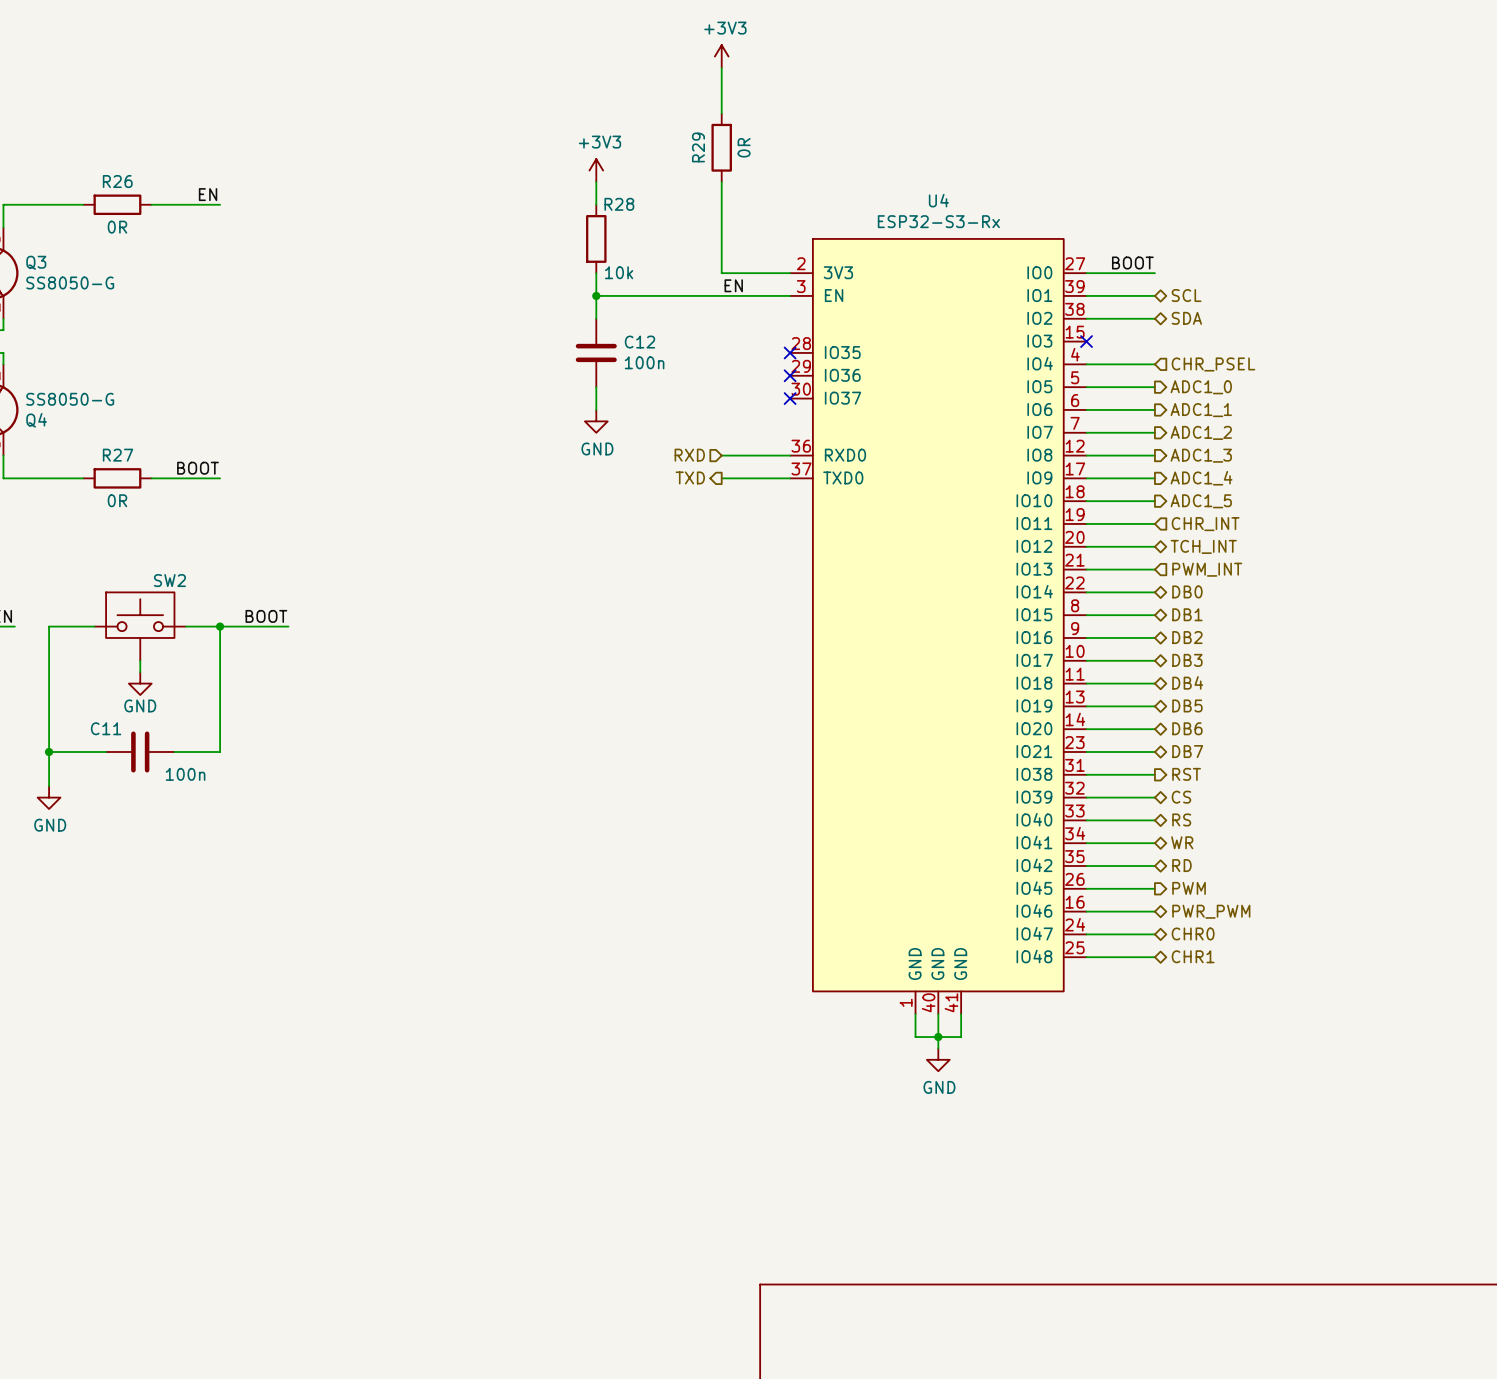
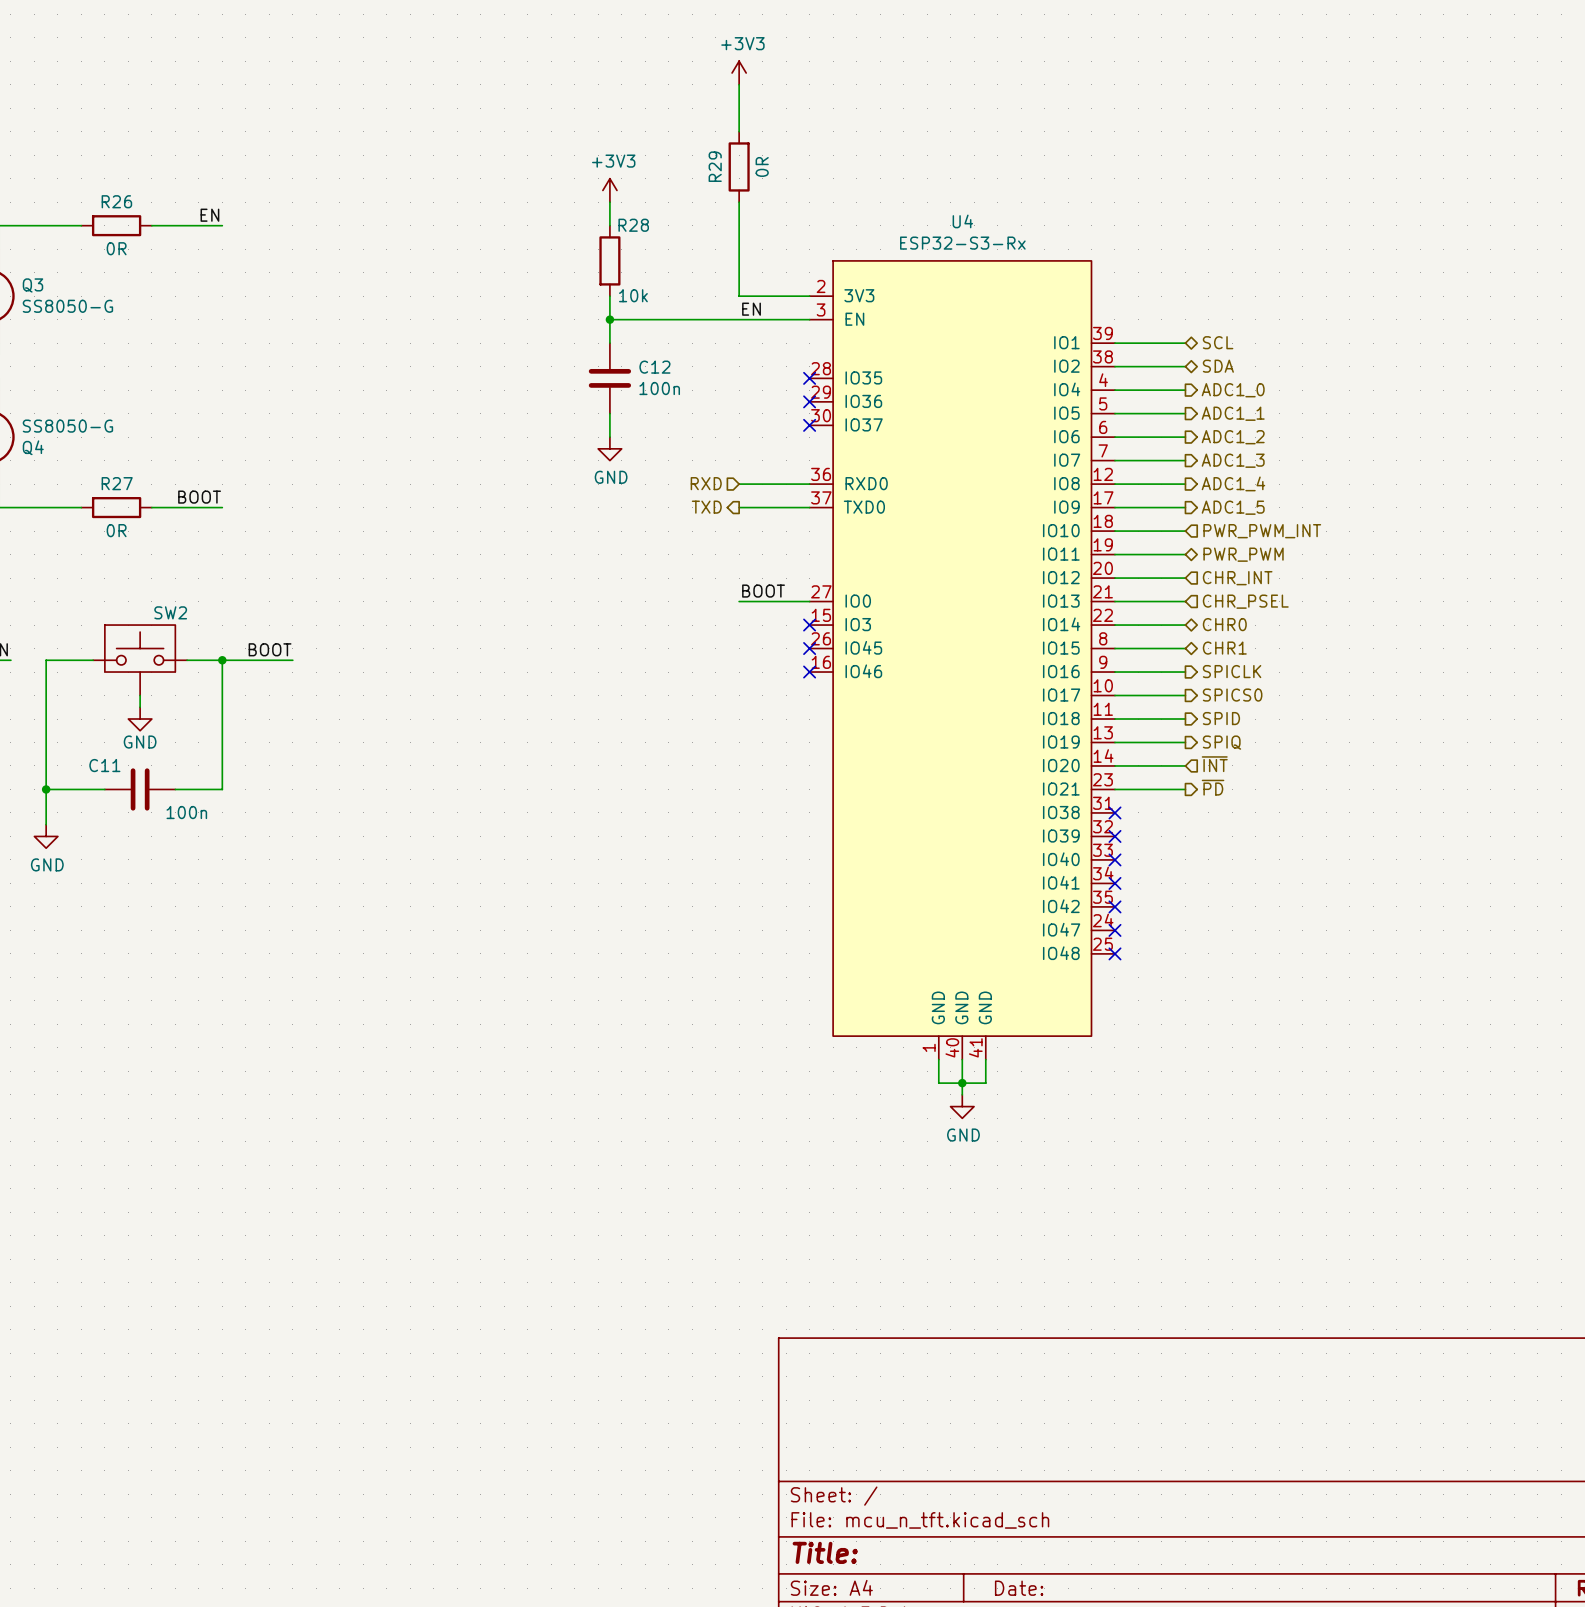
U4 symbol: [790, 238, 1087, 1015] -> [809, 260, 1115, 1060]
label: BOOT (1132, 262) -> none
wire: (1086, 273) (1154, 273) -> none
wire: (1086, 295) (1154, 295) -> (1114, 366) (1185, 366)
hierarchical label: SCL (1186, 295) -> none
hierarchical label: SDA (1186, 318) -> SCL (1218, 342)
no-connect mark: (1086, 341) -> none
hierarchical label: none -> SDA (1218, 366)
hierarchical label shape: input (1213, 364) -> output (1233, 390)
hierarchical label: CHR_PSEL (1213, 364) -> ADC1_0 (1233, 390)
hierarchical label: ADC1_0 (1201, 387) -> ADC1_1 (1233, 413)
hierarchical label: ADC1_1 (1201, 410) -> ADC1_2 (1233, 437)
hierarchical label: ADC1_2 (1201, 432) -> ADC1_3 (1233, 460)
hierarchical label: ADC1_3 (1201, 455) -> ADC1_4 (1233, 483)
hierarchical label: ADC1_4 (1201, 478) -> ADC1_5 (1233, 507)
hierarchical label shape: output (1201, 501) -> input (1262, 531)
hierarchical label: ADC1_5 (1201, 501) -> PWR_PWM_INT (1262, 531)
hierarchical label shape: input (1205, 524) -> bidirectional (1243, 554)
hierarchical label: CHR_INT (1205, 524) -> PWR_PWM (1243, 554)
hierarchical label shape: bidirectional (1203, 546) -> input (1237, 578)
hierarchical label: TCH_INT (1203, 546) -> CHR_INT (1237, 578)
label: none -> BOOT (763, 591)
wire: none -> (739, 601) (809, 601)
hierarchical label: PWM_INT (1207, 569) -> CHR_PSEL (1245, 601)
hierarchical label: DB0 (1187, 591) -> CHR0 (1224, 624)
no-connect mark: none -> (809, 625)
hierarchical label: DB1 (1187, 614) -> CHR1 (1224, 648)
no-connect mark: none -> (809, 648)
no-connect mark: none -> (809, 672)
hierarchical label shape: bidirectional (1187, 637) -> output (1232, 671)
hierarchical label: DB2 (1187, 637) -> SPICLK (1232, 671)
hierarchical label shape: bidirectional (1187, 660) -> output (1232, 695)
hierarchical label: DB3 (1187, 660) -> SPICS0 (1232, 695)
hierarchical label shape: bidirectional (1187, 682) -> output (1221, 718)
hierarchical label: DB4 (1187, 682) -> SPID (1221, 718)
hierarchical label shape: bidirectional (1187, 705) -> output (1221, 742)
hierarchical label: DB5 (1187, 705) -> SPIQ (1221, 742)
hierarchical label shape: bidirectional (1187, 728) -> input (1214, 764)
hierarchical label: DB6 (1187, 728) -> ~{INT} (1214, 764)
hierarchical label shape: bidirectional (1187, 751) -> output (1213, 787)
hierarchical label: DB7 (1187, 751) -> ~{PD} (1213, 787)
wire: (1086, 774) (1154, 774) -> none
no-connect mark: none -> (1114, 812)
hierarchical label: RST (1186, 774) -> none
wire: (1086, 797) (1154, 797) -> none
no-connect mark: none -> (1114, 836)
hierarchical label: CS (1181, 797) -> none
hierarchical label: RS (1181, 819) -> none
wire: (1086, 820) (1154, 820) -> none
no-connect mark: none -> (1114, 859)
hierarchical label: WR (1182, 842) -> none
wire: (1086, 843) (1154, 843) -> none
no-connect mark: none -> (1114, 883)
hierarchical label: RD (1181, 865) -> none
wire: (1086, 866) (1154, 866) -> none
no-connect mark: none -> (1114, 906)
wire: (1086, 888) (1154, 888) -> none
no-connect mark: none -> (1114, 930)
hierarchical label: PWM (1189, 888) -> none
wire: (1086, 911) (1154, 911) -> none
no-connect mark: none -> (1114, 953)
hierarchical label: PWR_PWM (1211, 911) -> none
hierarchical label: CHR0 (1193, 933) -> none
wire: (1086, 934) (1154, 934) -> none
hierarchical label: CHR1 (1193, 956) -> none
wire: (1086, 957) (1154, 957) -> none

